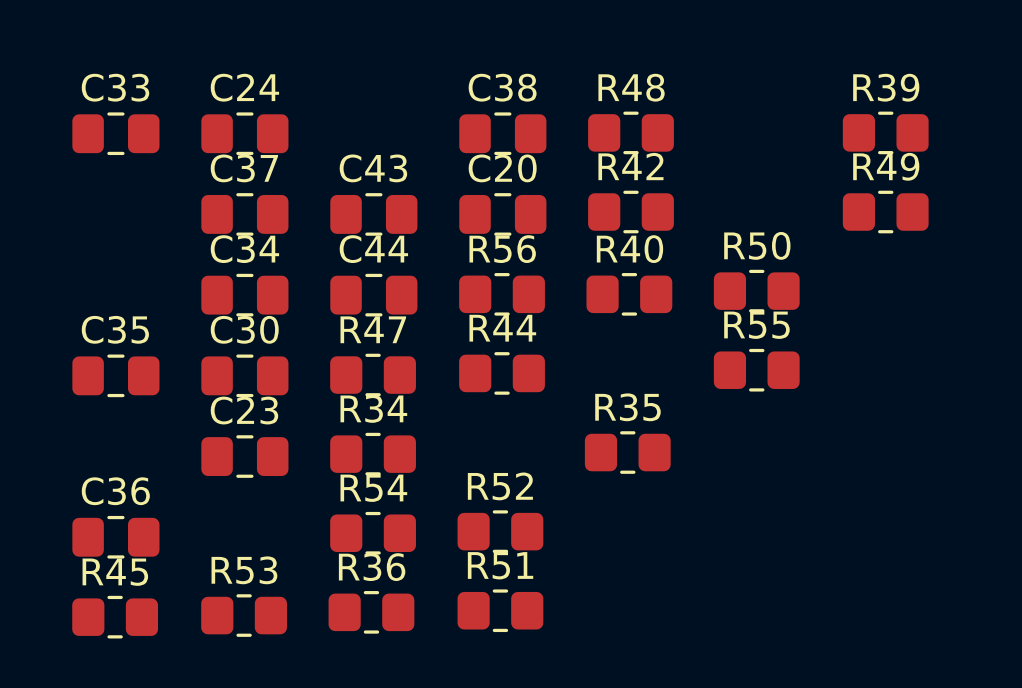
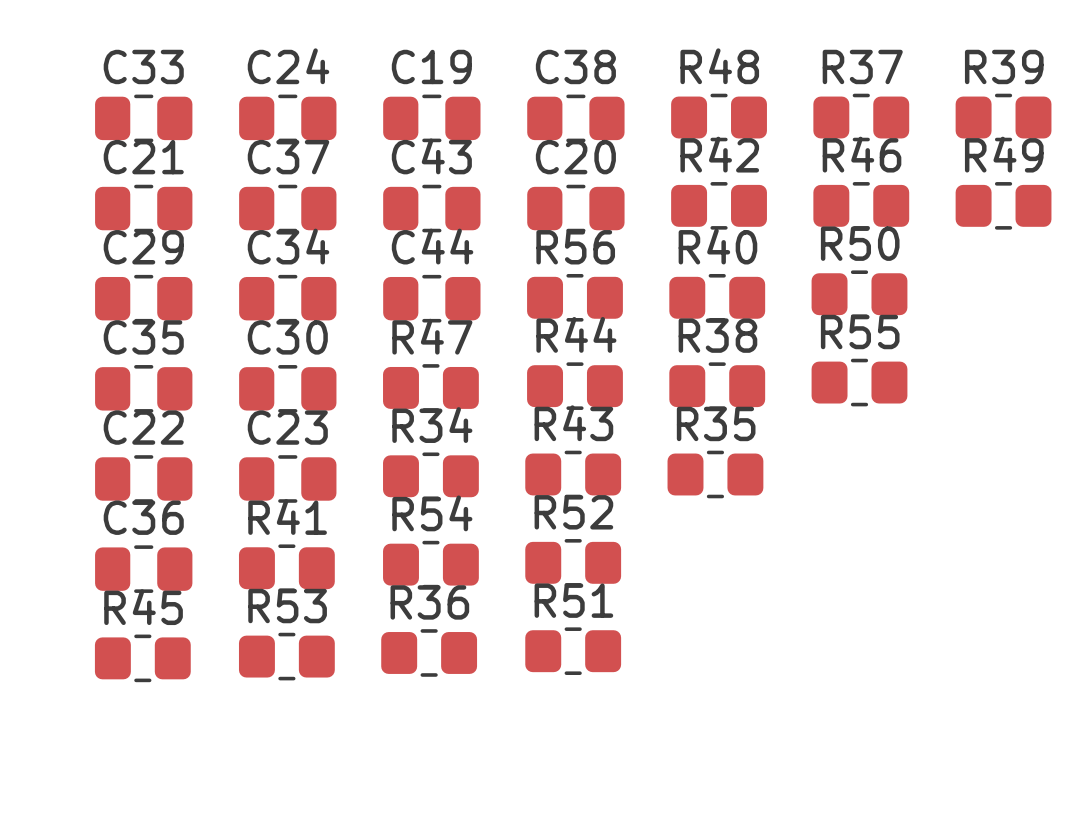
R37: none -> (861, 117)
C19: none -> (431, 118)
R46: none -> (861, 205)
C21: none -> (143, 208)
C29: none -> (143, 298)
R38: none -> (717, 386)
R43: none -> (573, 474)
C22: none -> (143, 478)
R41: none -> (286, 568)

